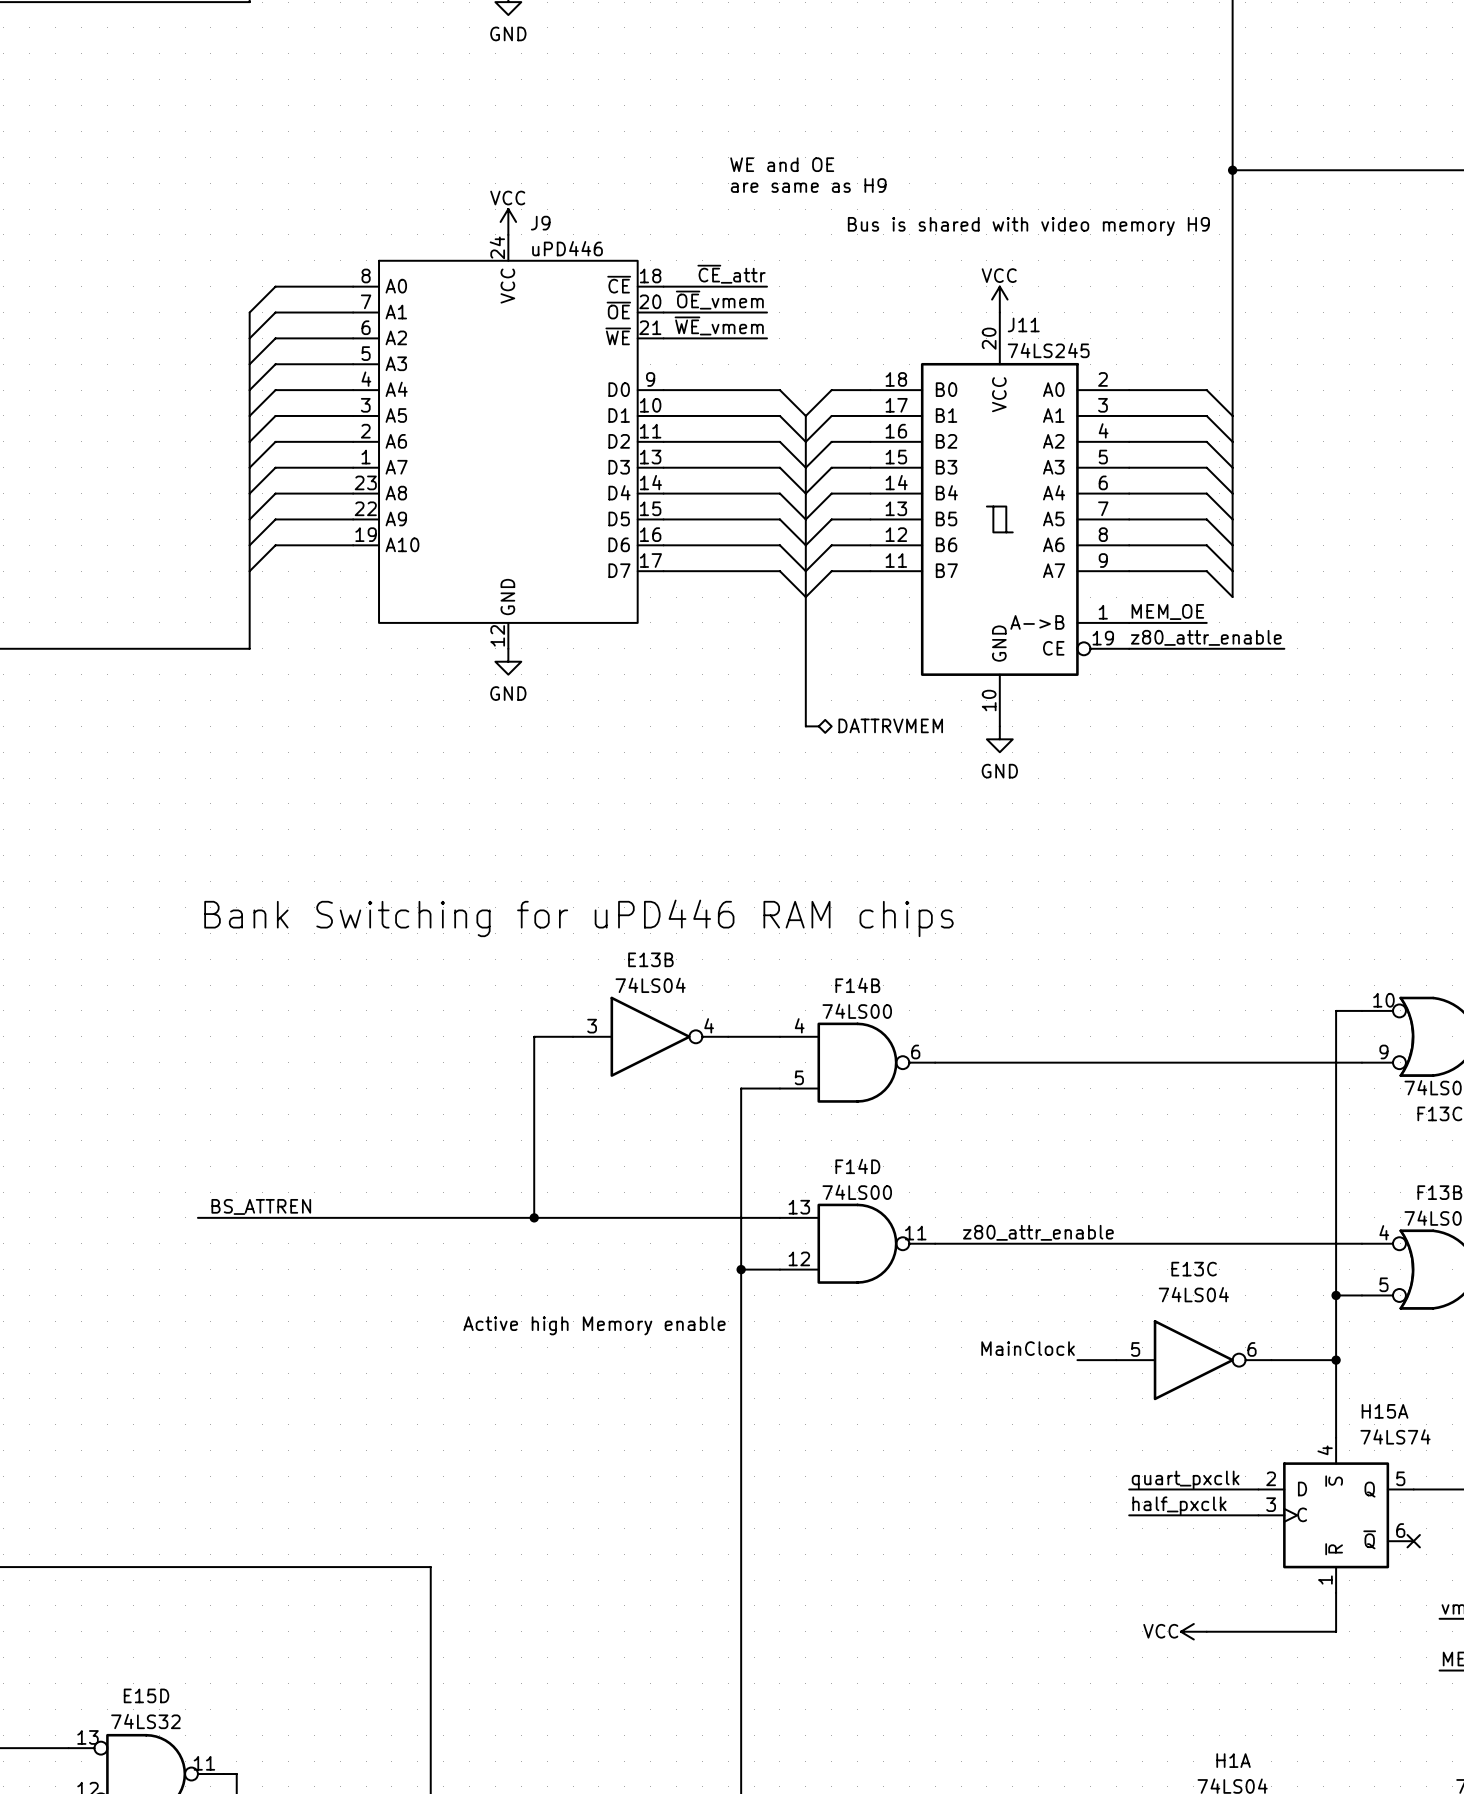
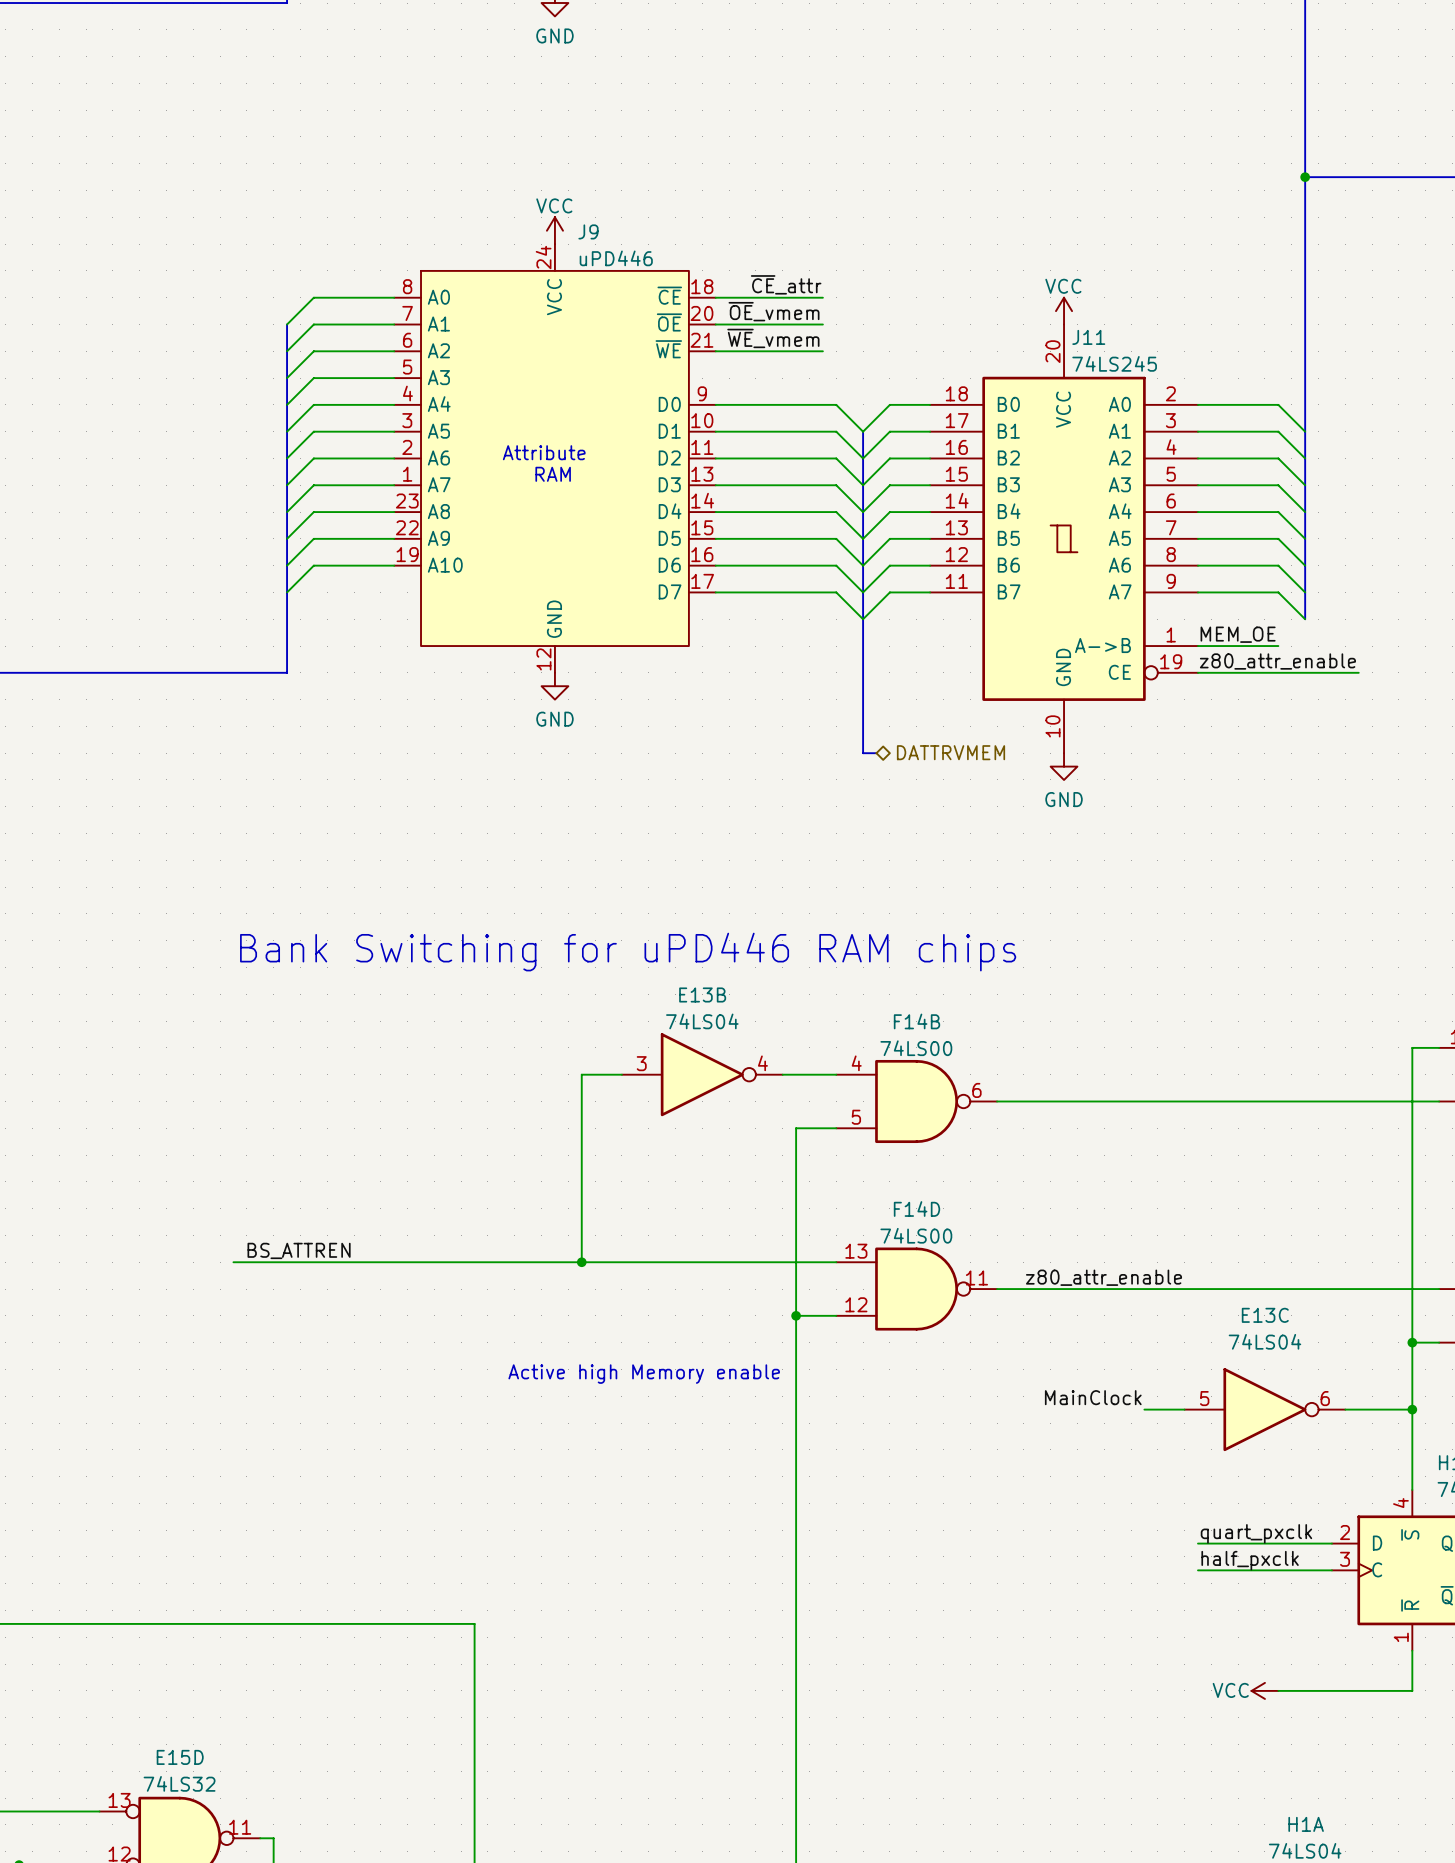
text: WE and OE (782, 164) -> none
text: are same as H9 (808, 185) -> none
text: Bus is shared with video memory H9 (1028, 226) -> none
text: none -> Attribute (544, 452)
text: none -> RAM (553, 474)

